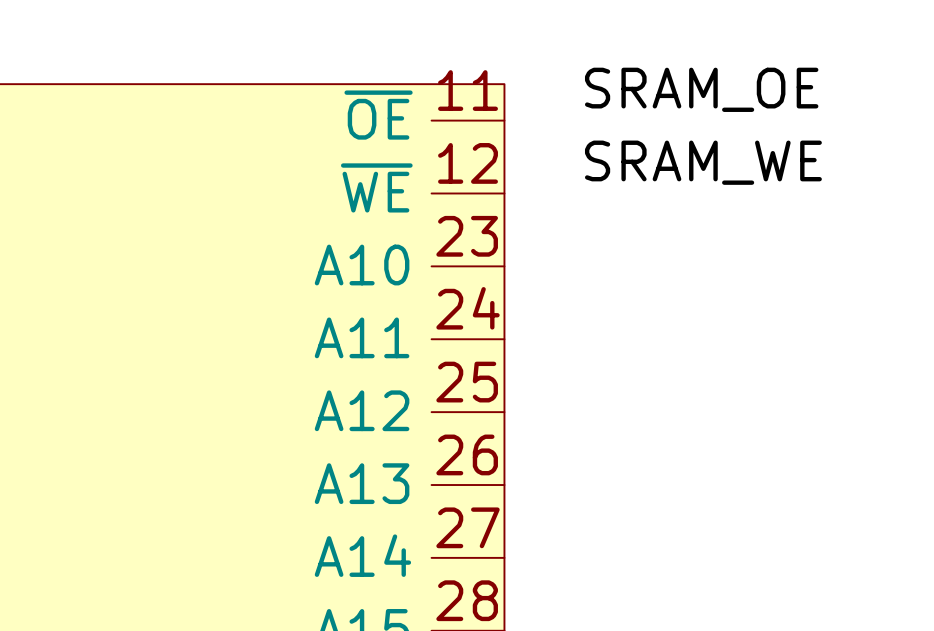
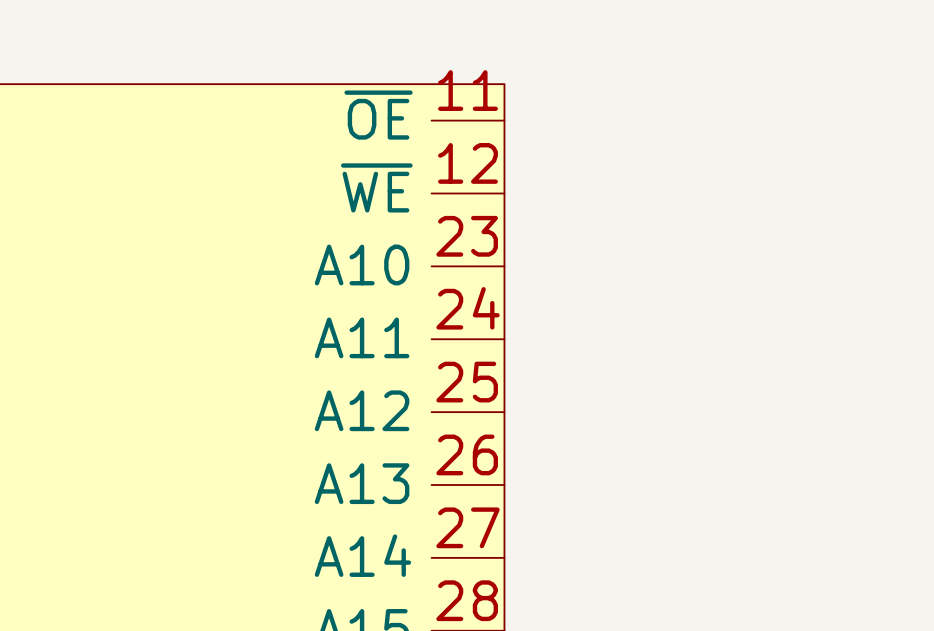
label: SRAM_OE (701, 89) -> none
label: SRAM_WE (703, 162) -> none

